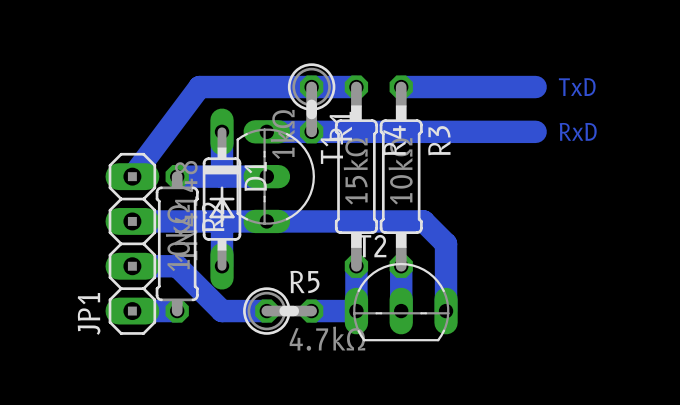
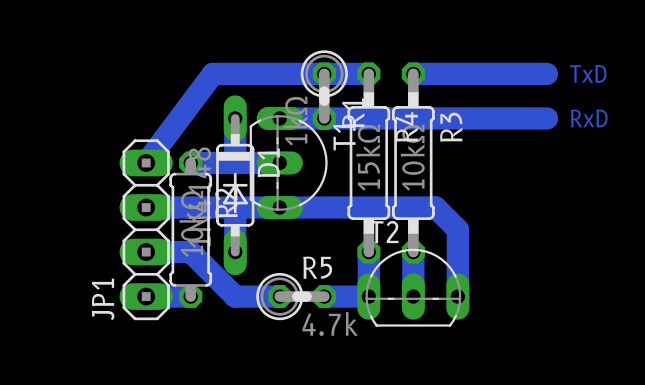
R5 value: 4.7kΩ (327, 338) -> 4.7k (330, 324)

